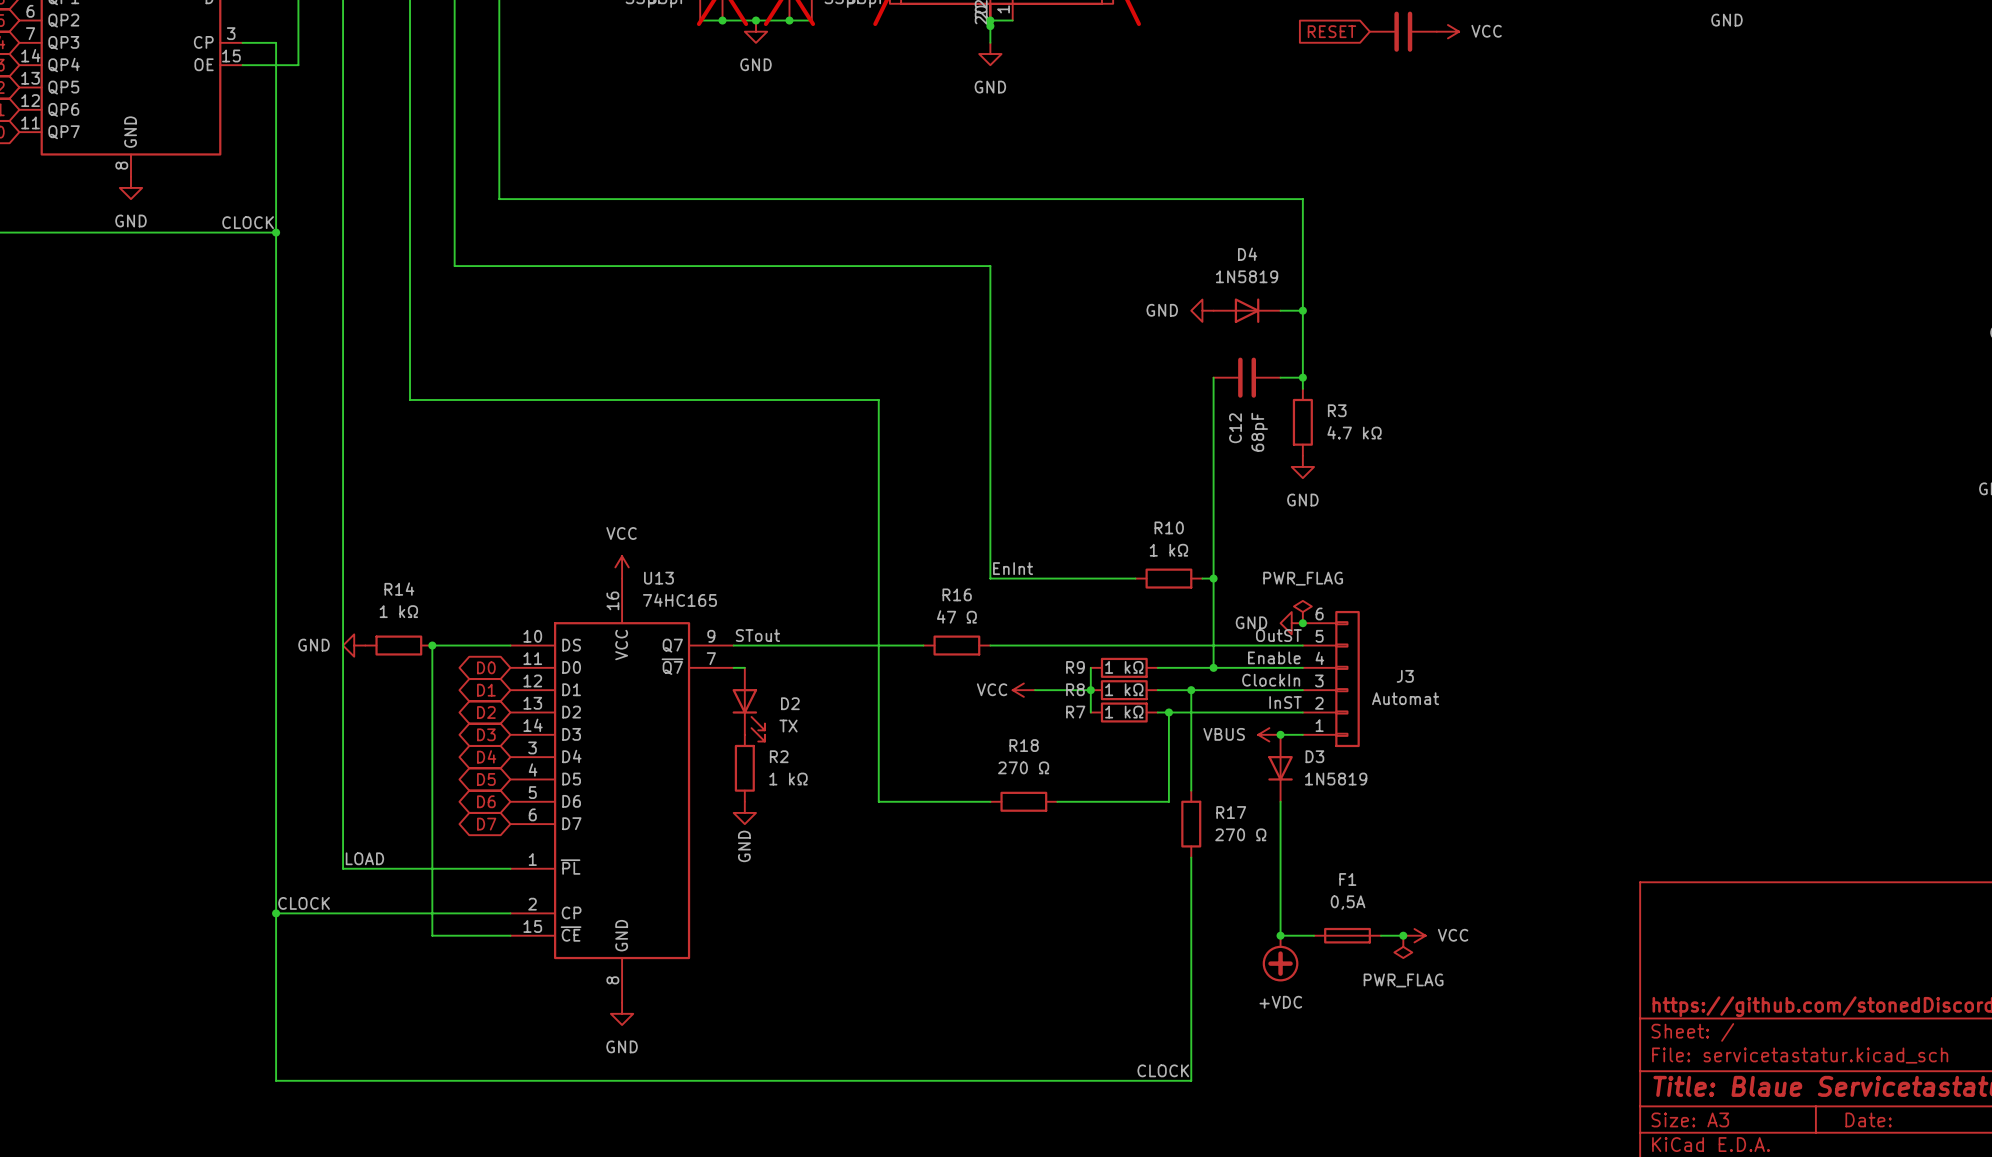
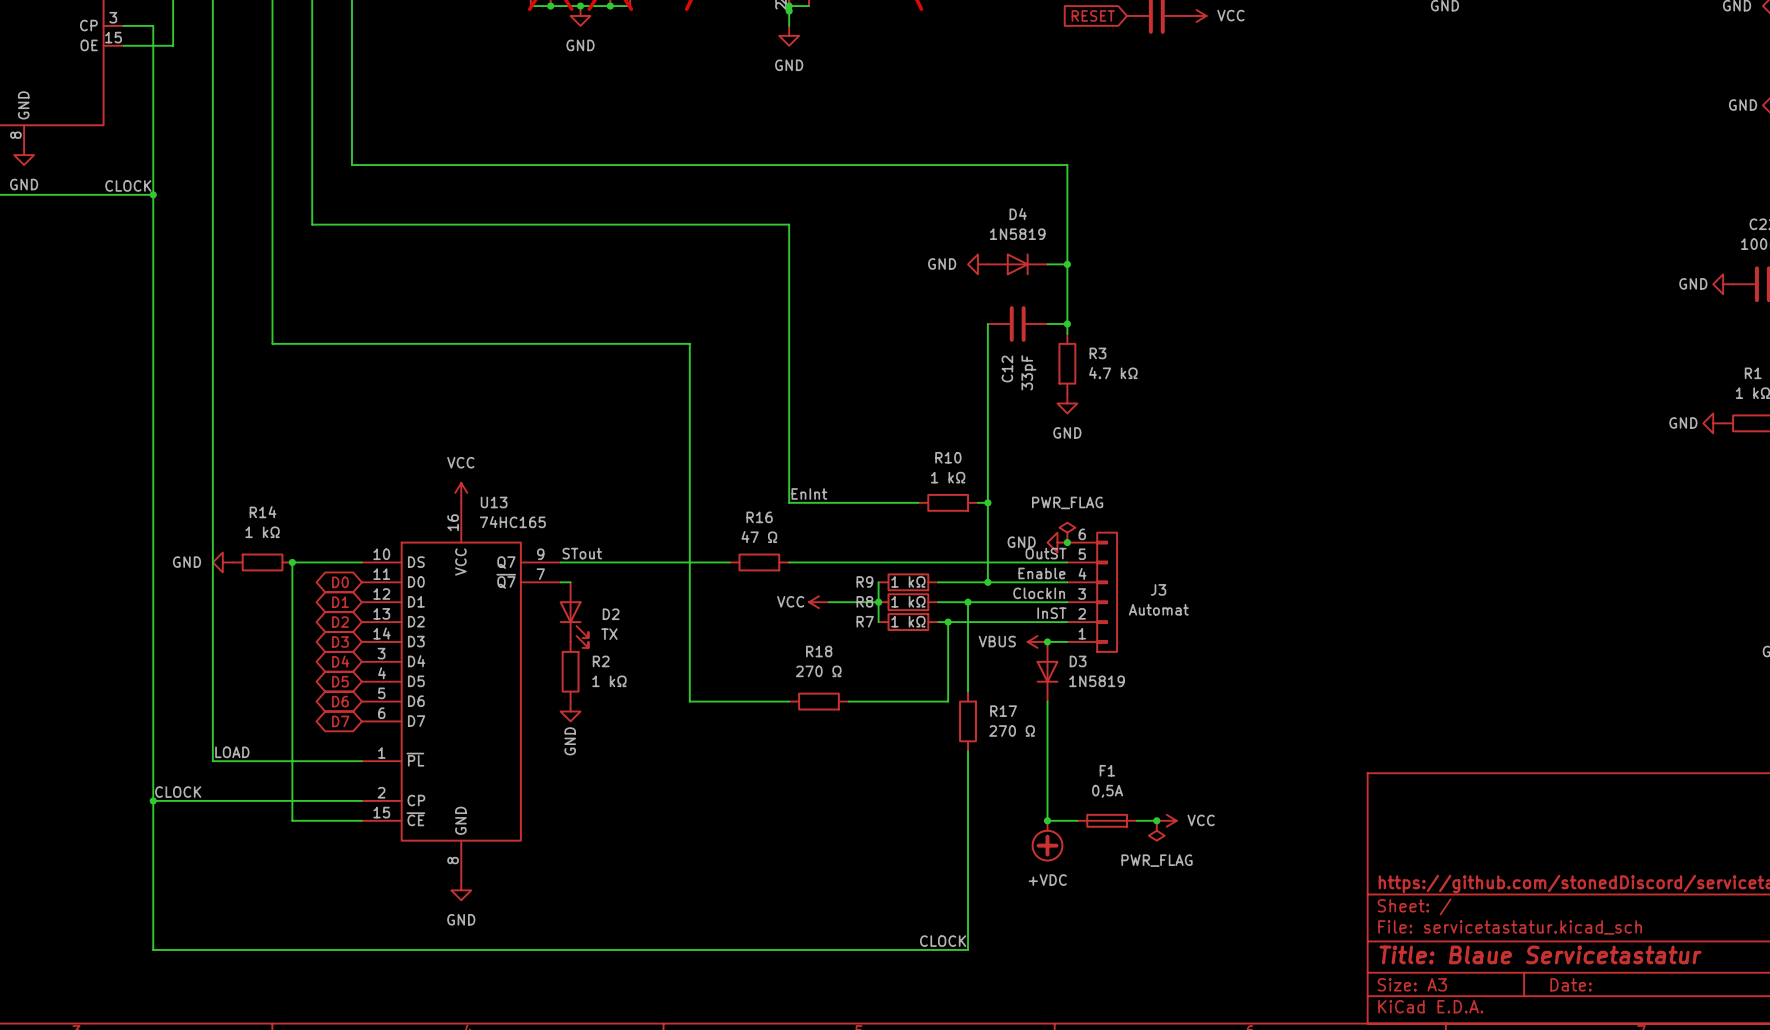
C12 value: 68pF (1259, 432) -> 33pF (1028, 372)

